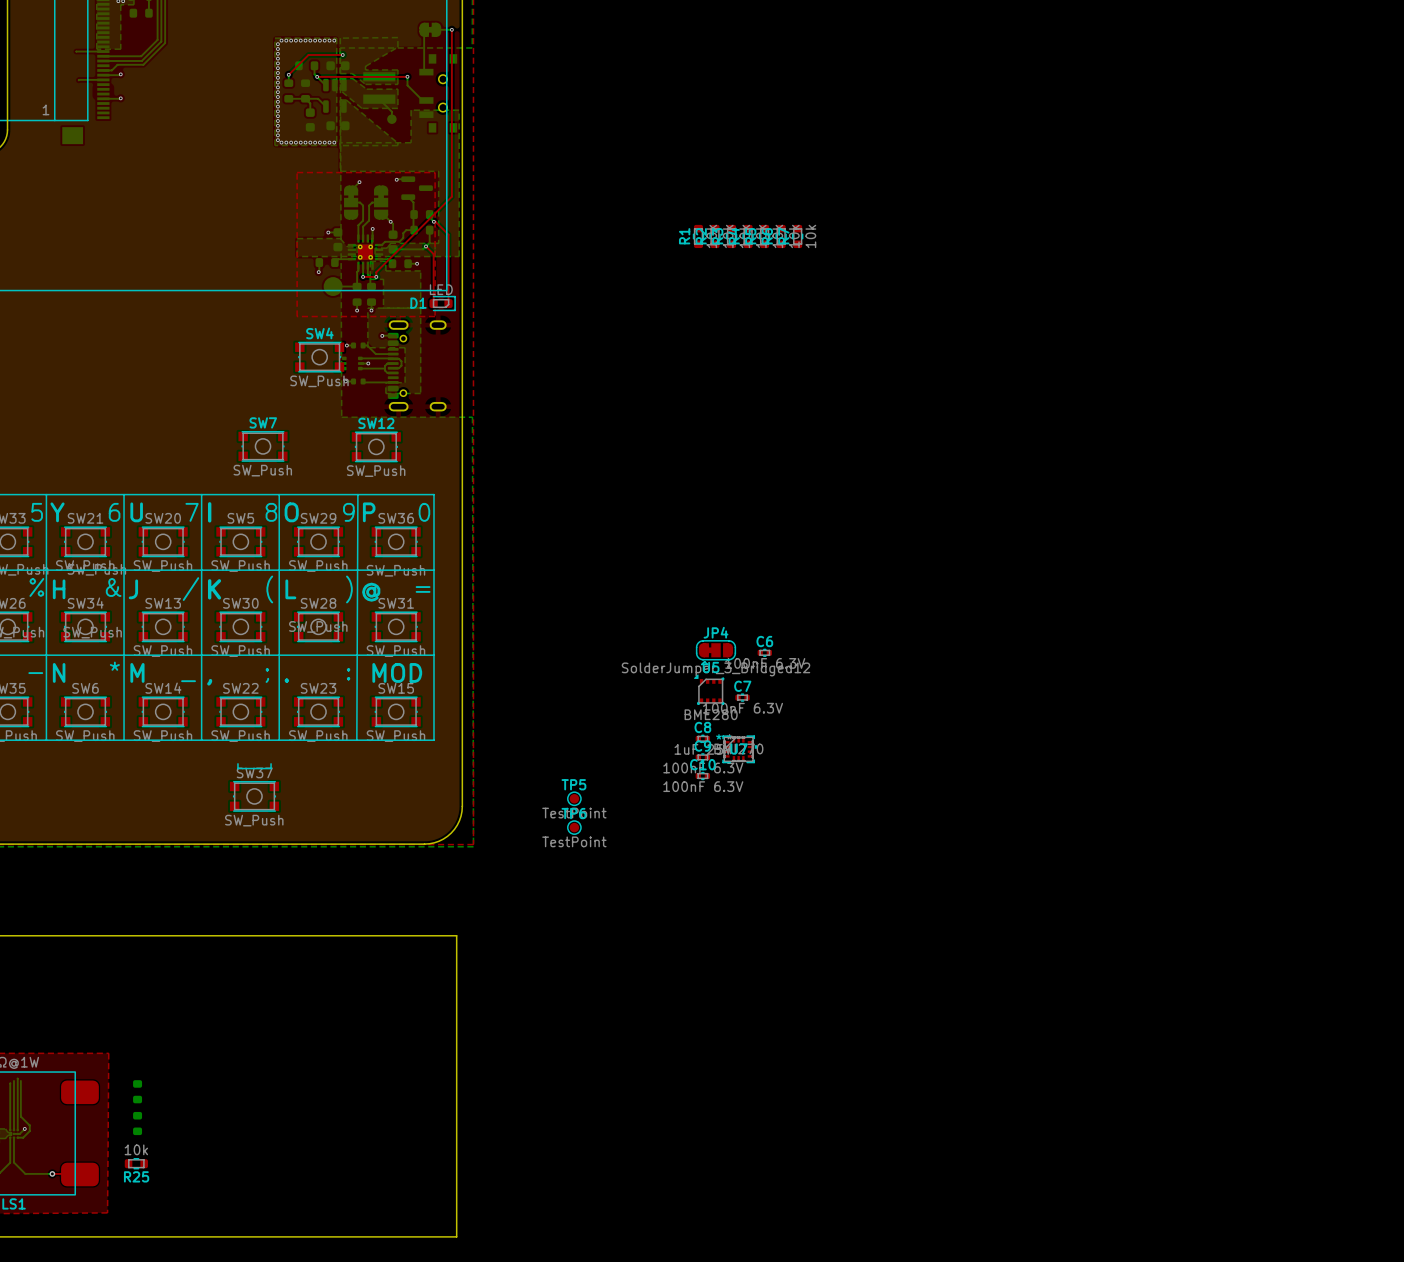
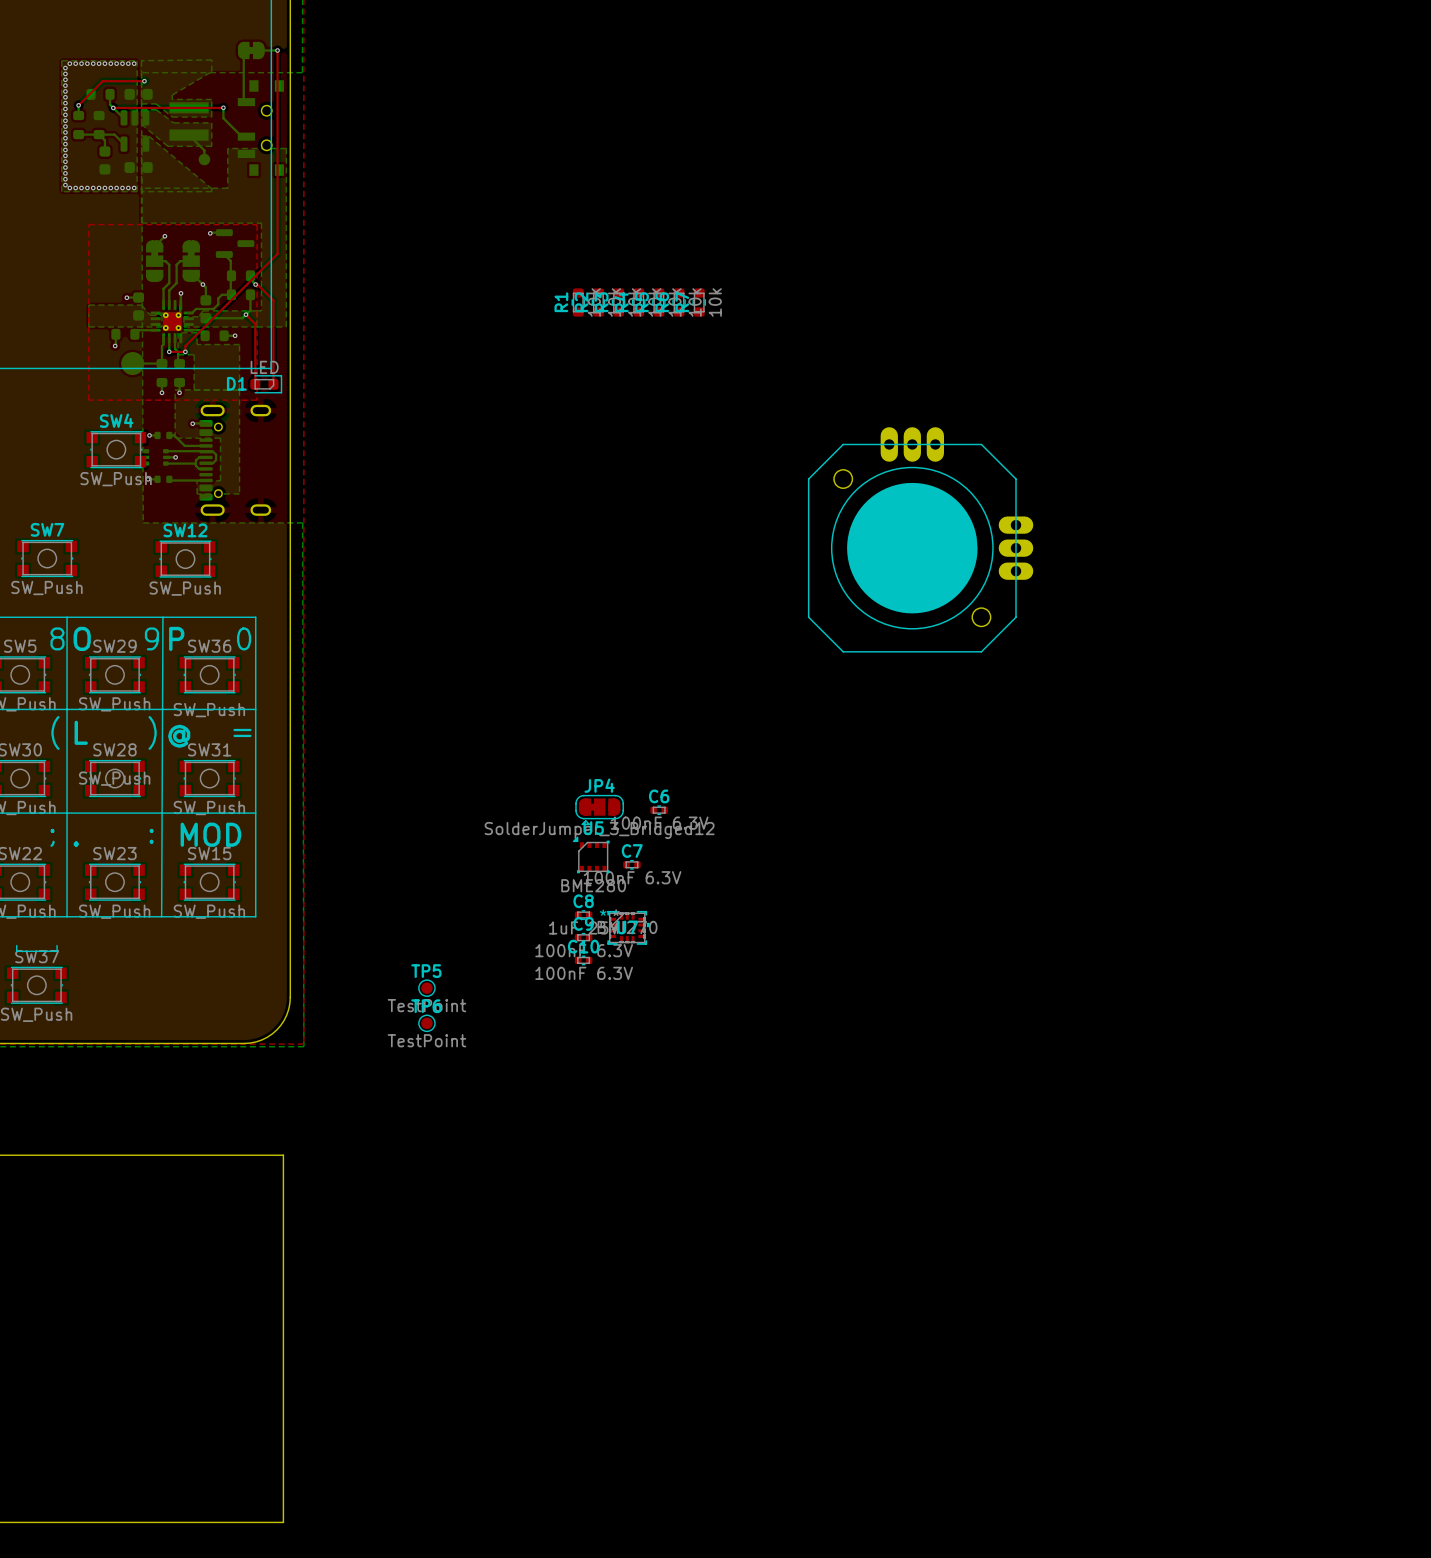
part: none -> (920, 539)

